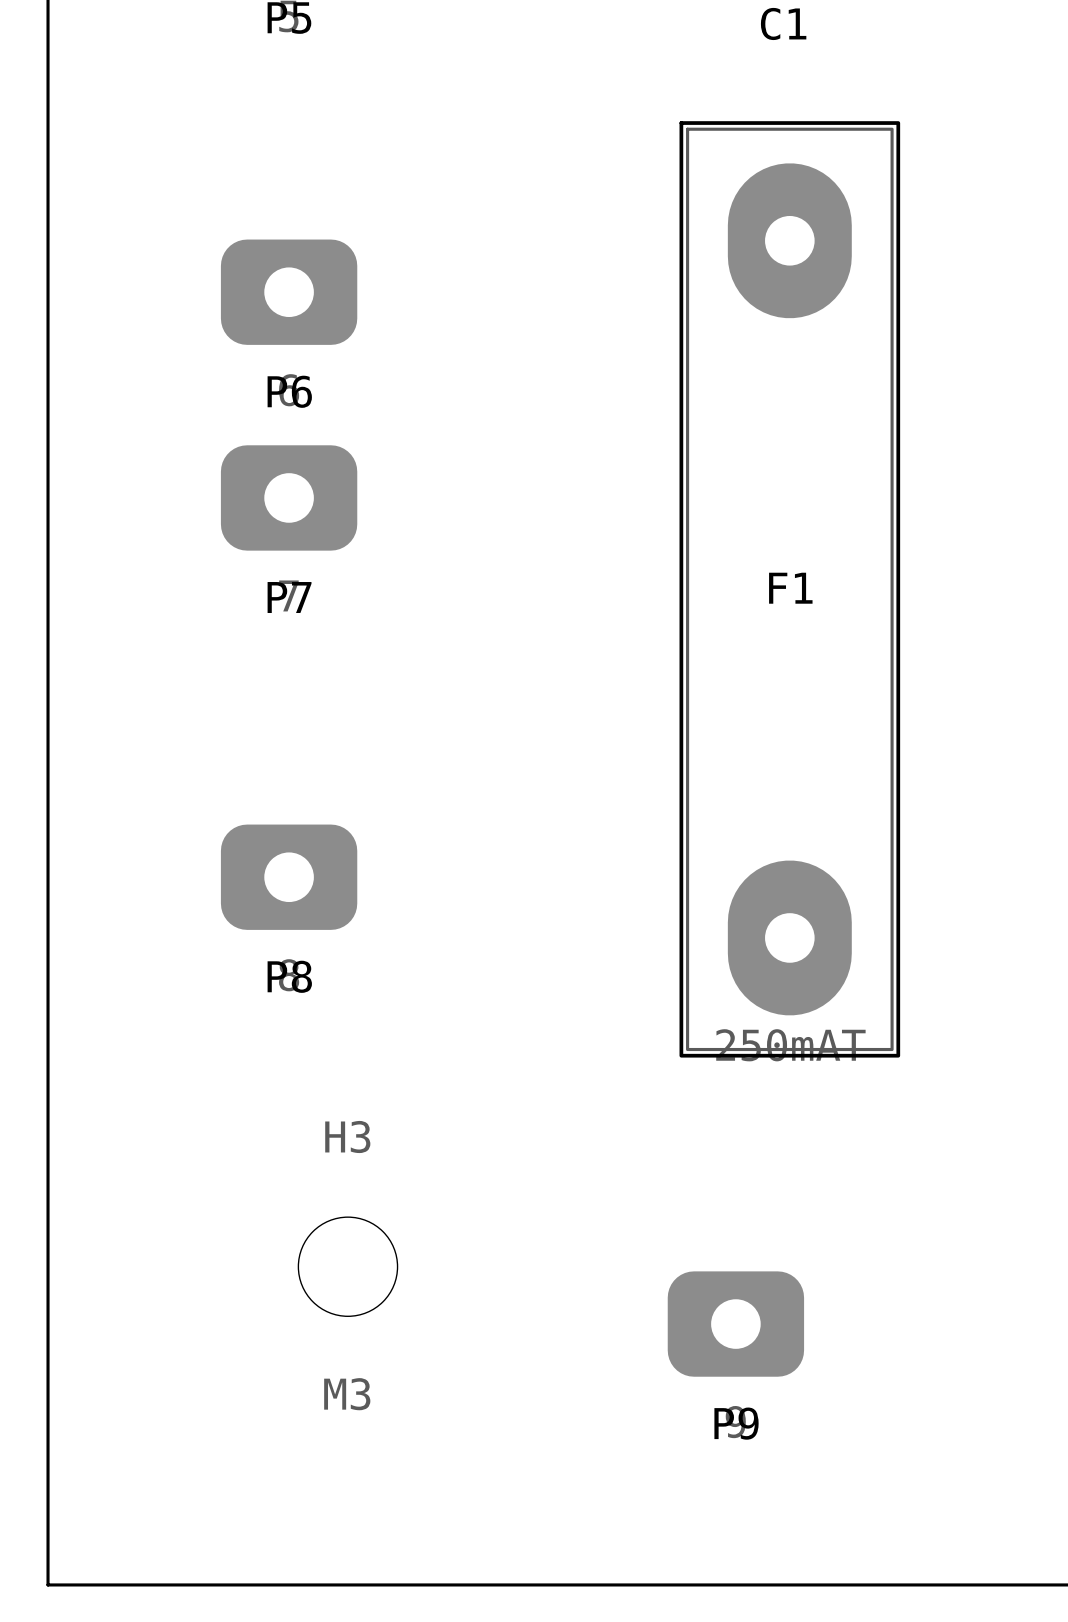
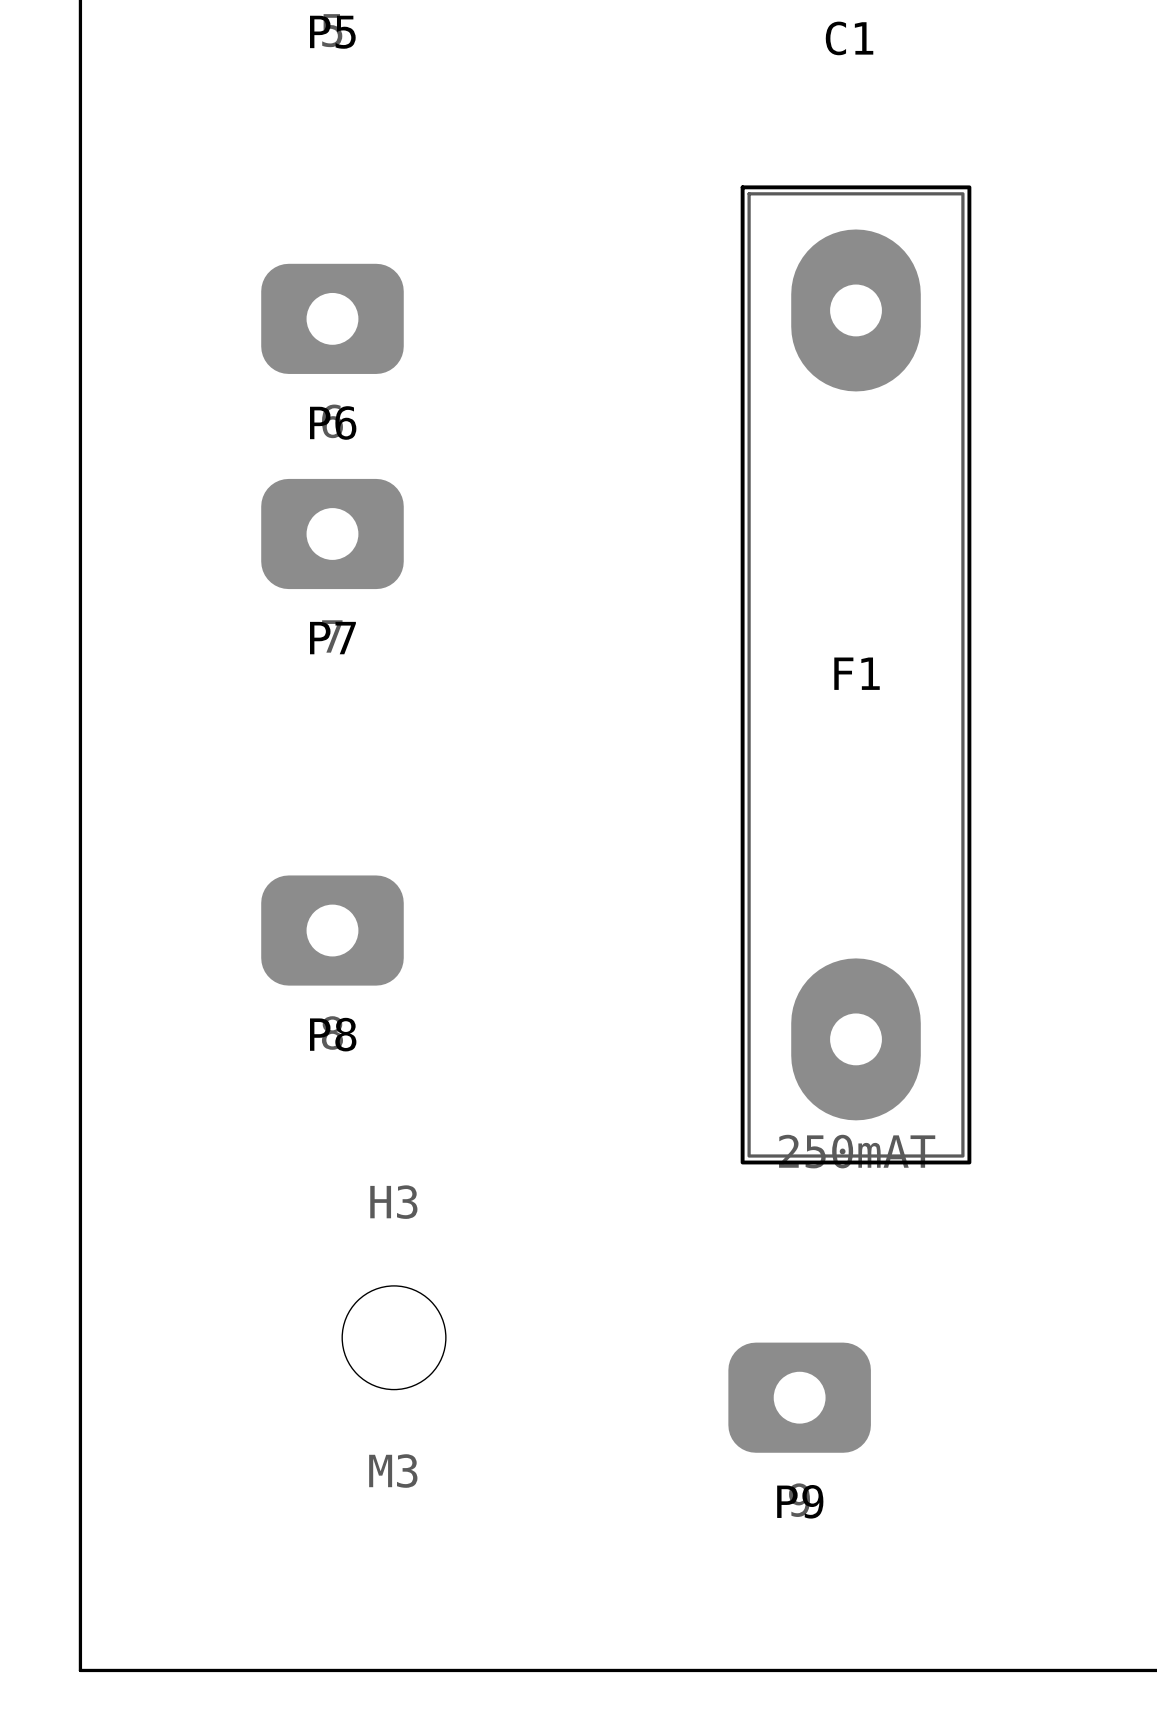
F1 position: (789, 589) -> (856, 674)

